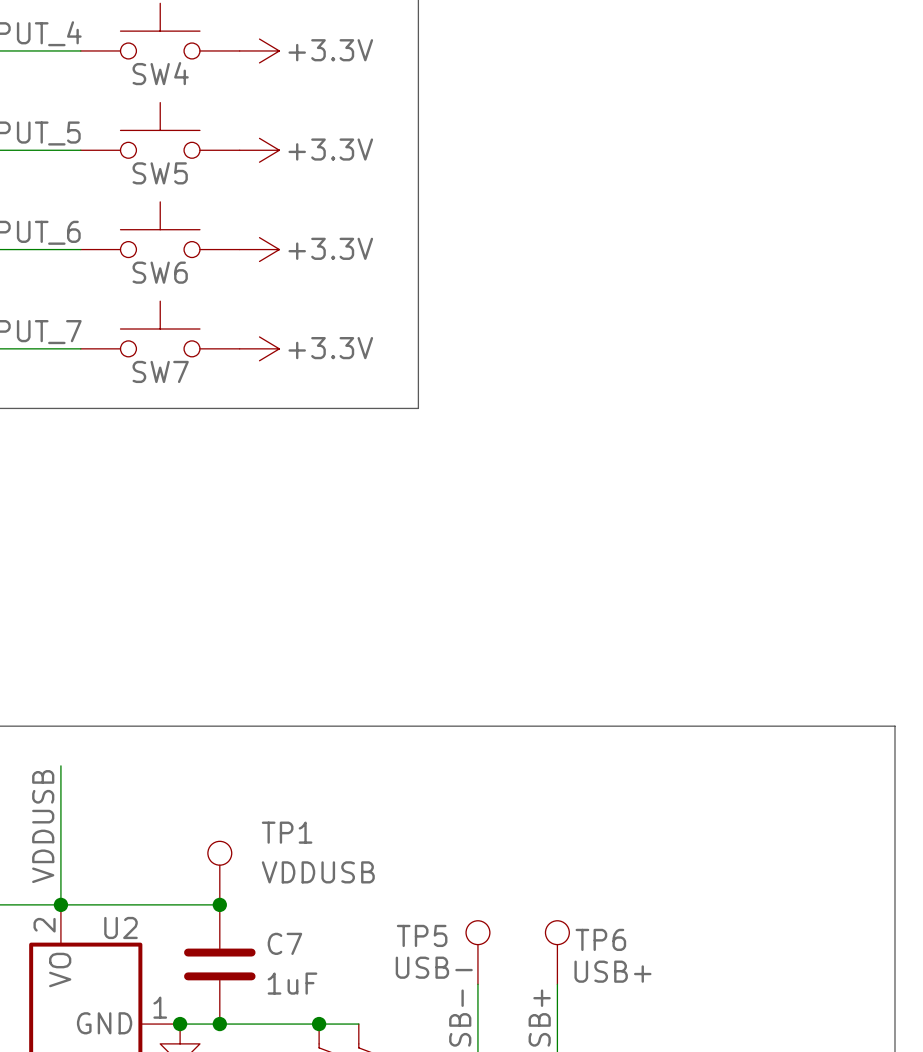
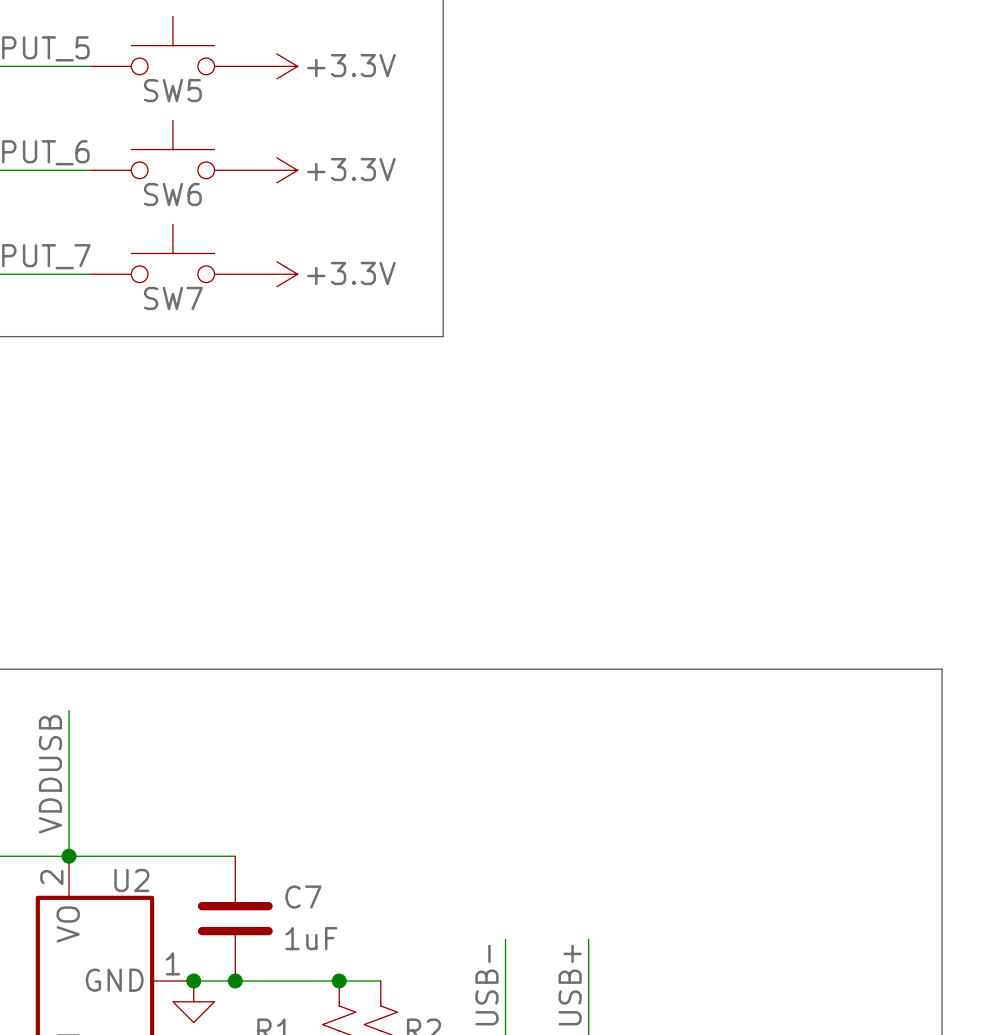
TP1: VDDUSB (219, 873) -> none
junction: (219, 904) -> none
TP5: USB- (477, 952) -> none
TP6: USB+ (557, 952) -> none

